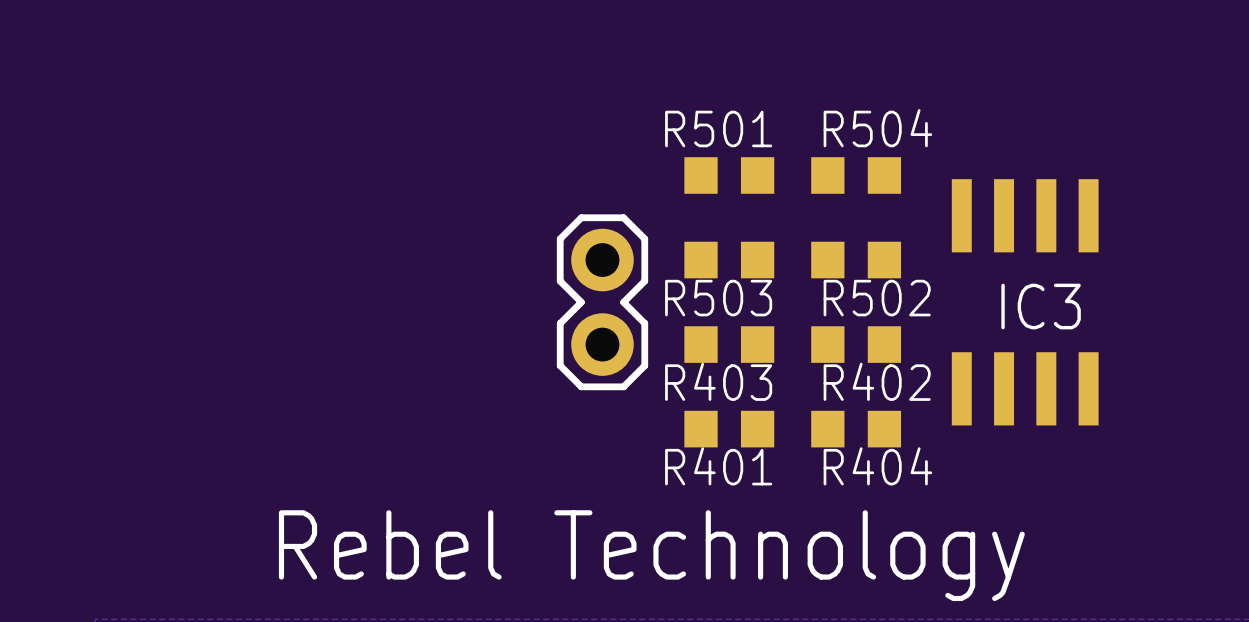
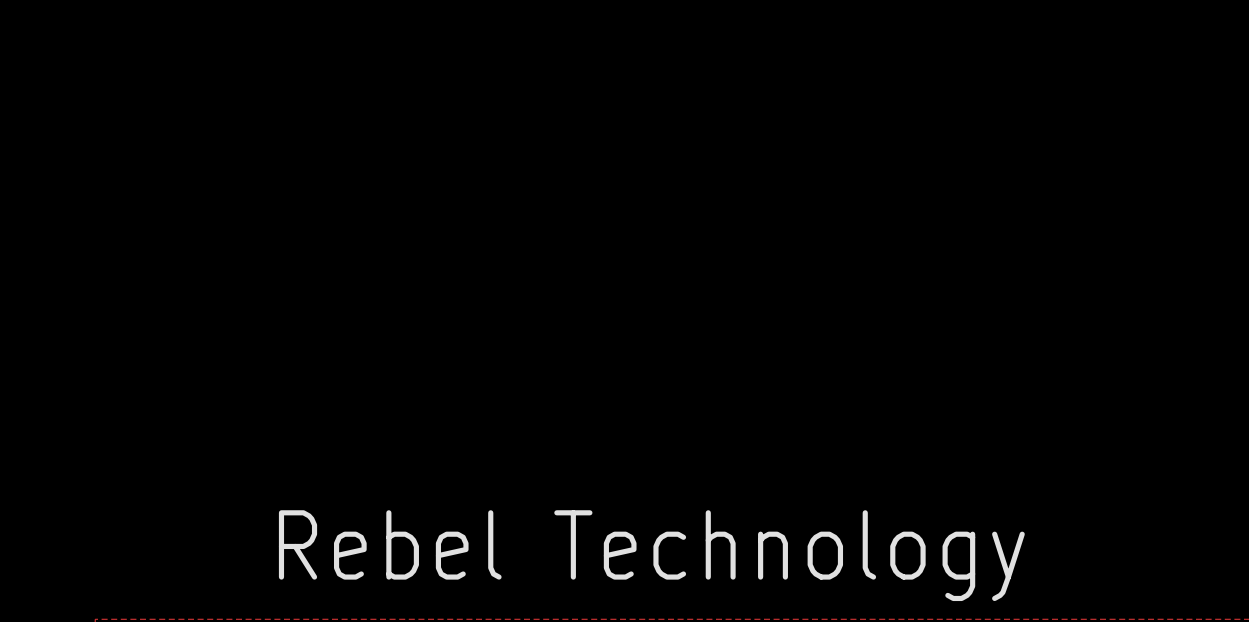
R501: (729, 175) -> none
R504: (856, 175) -> none
R503: (729, 260) -> none
R502: (856, 260) -> none
part: (602, 302) -> none
IC3: (1025, 302) -> none
R403: (729, 344) -> none
R402: (856, 344) -> none
R401: (729, 429) -> none
R404: (856, 429) -> none

